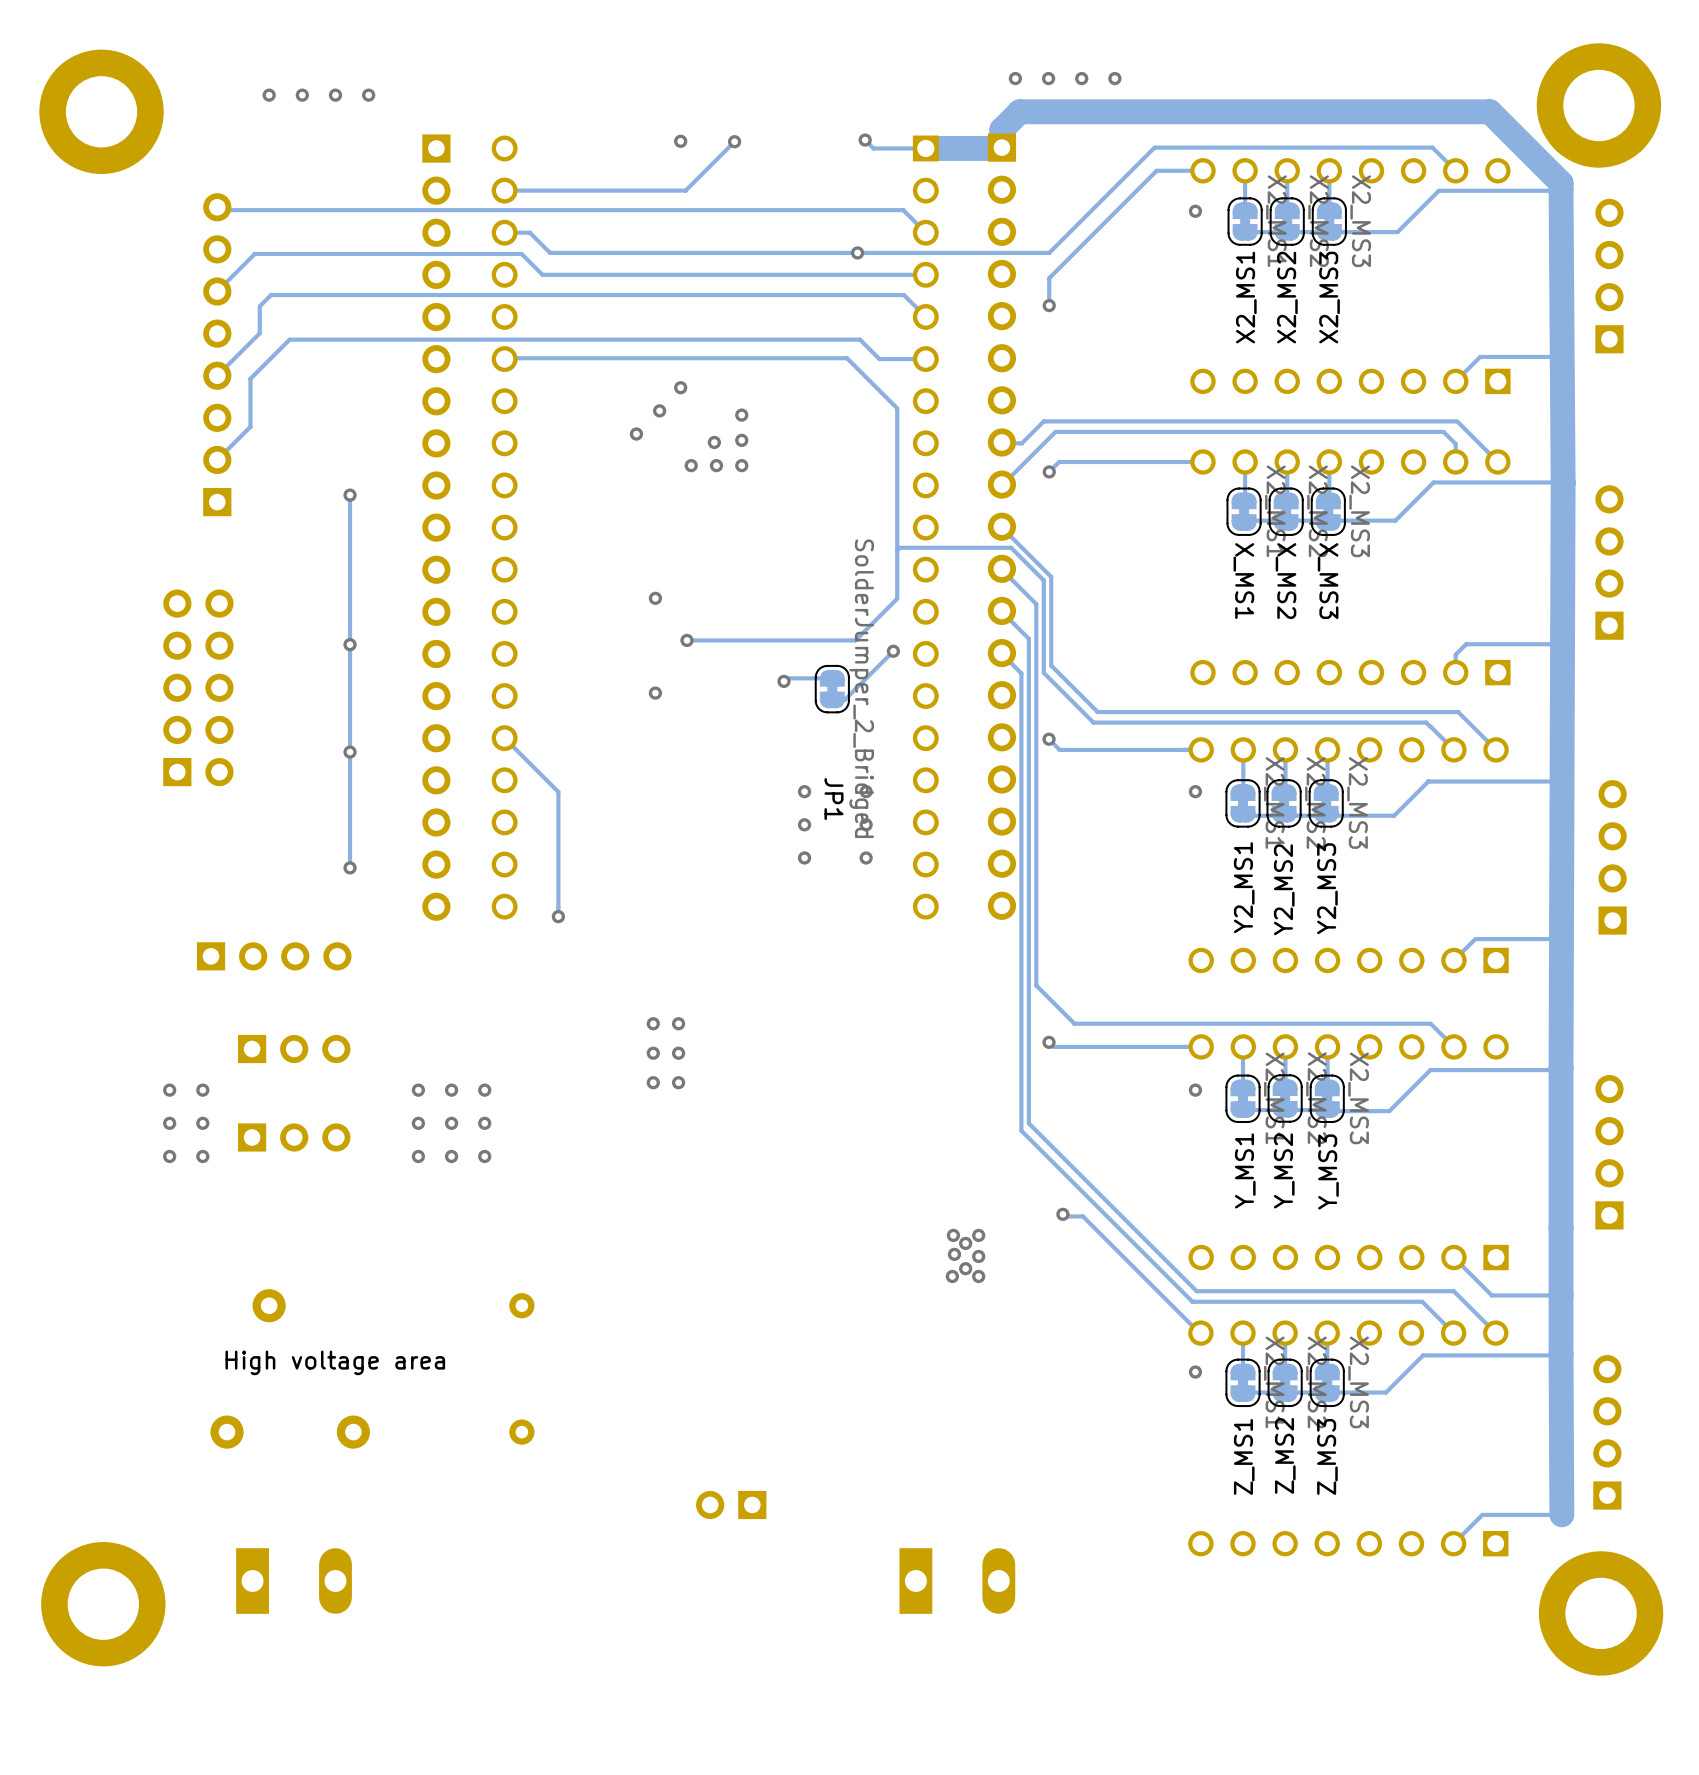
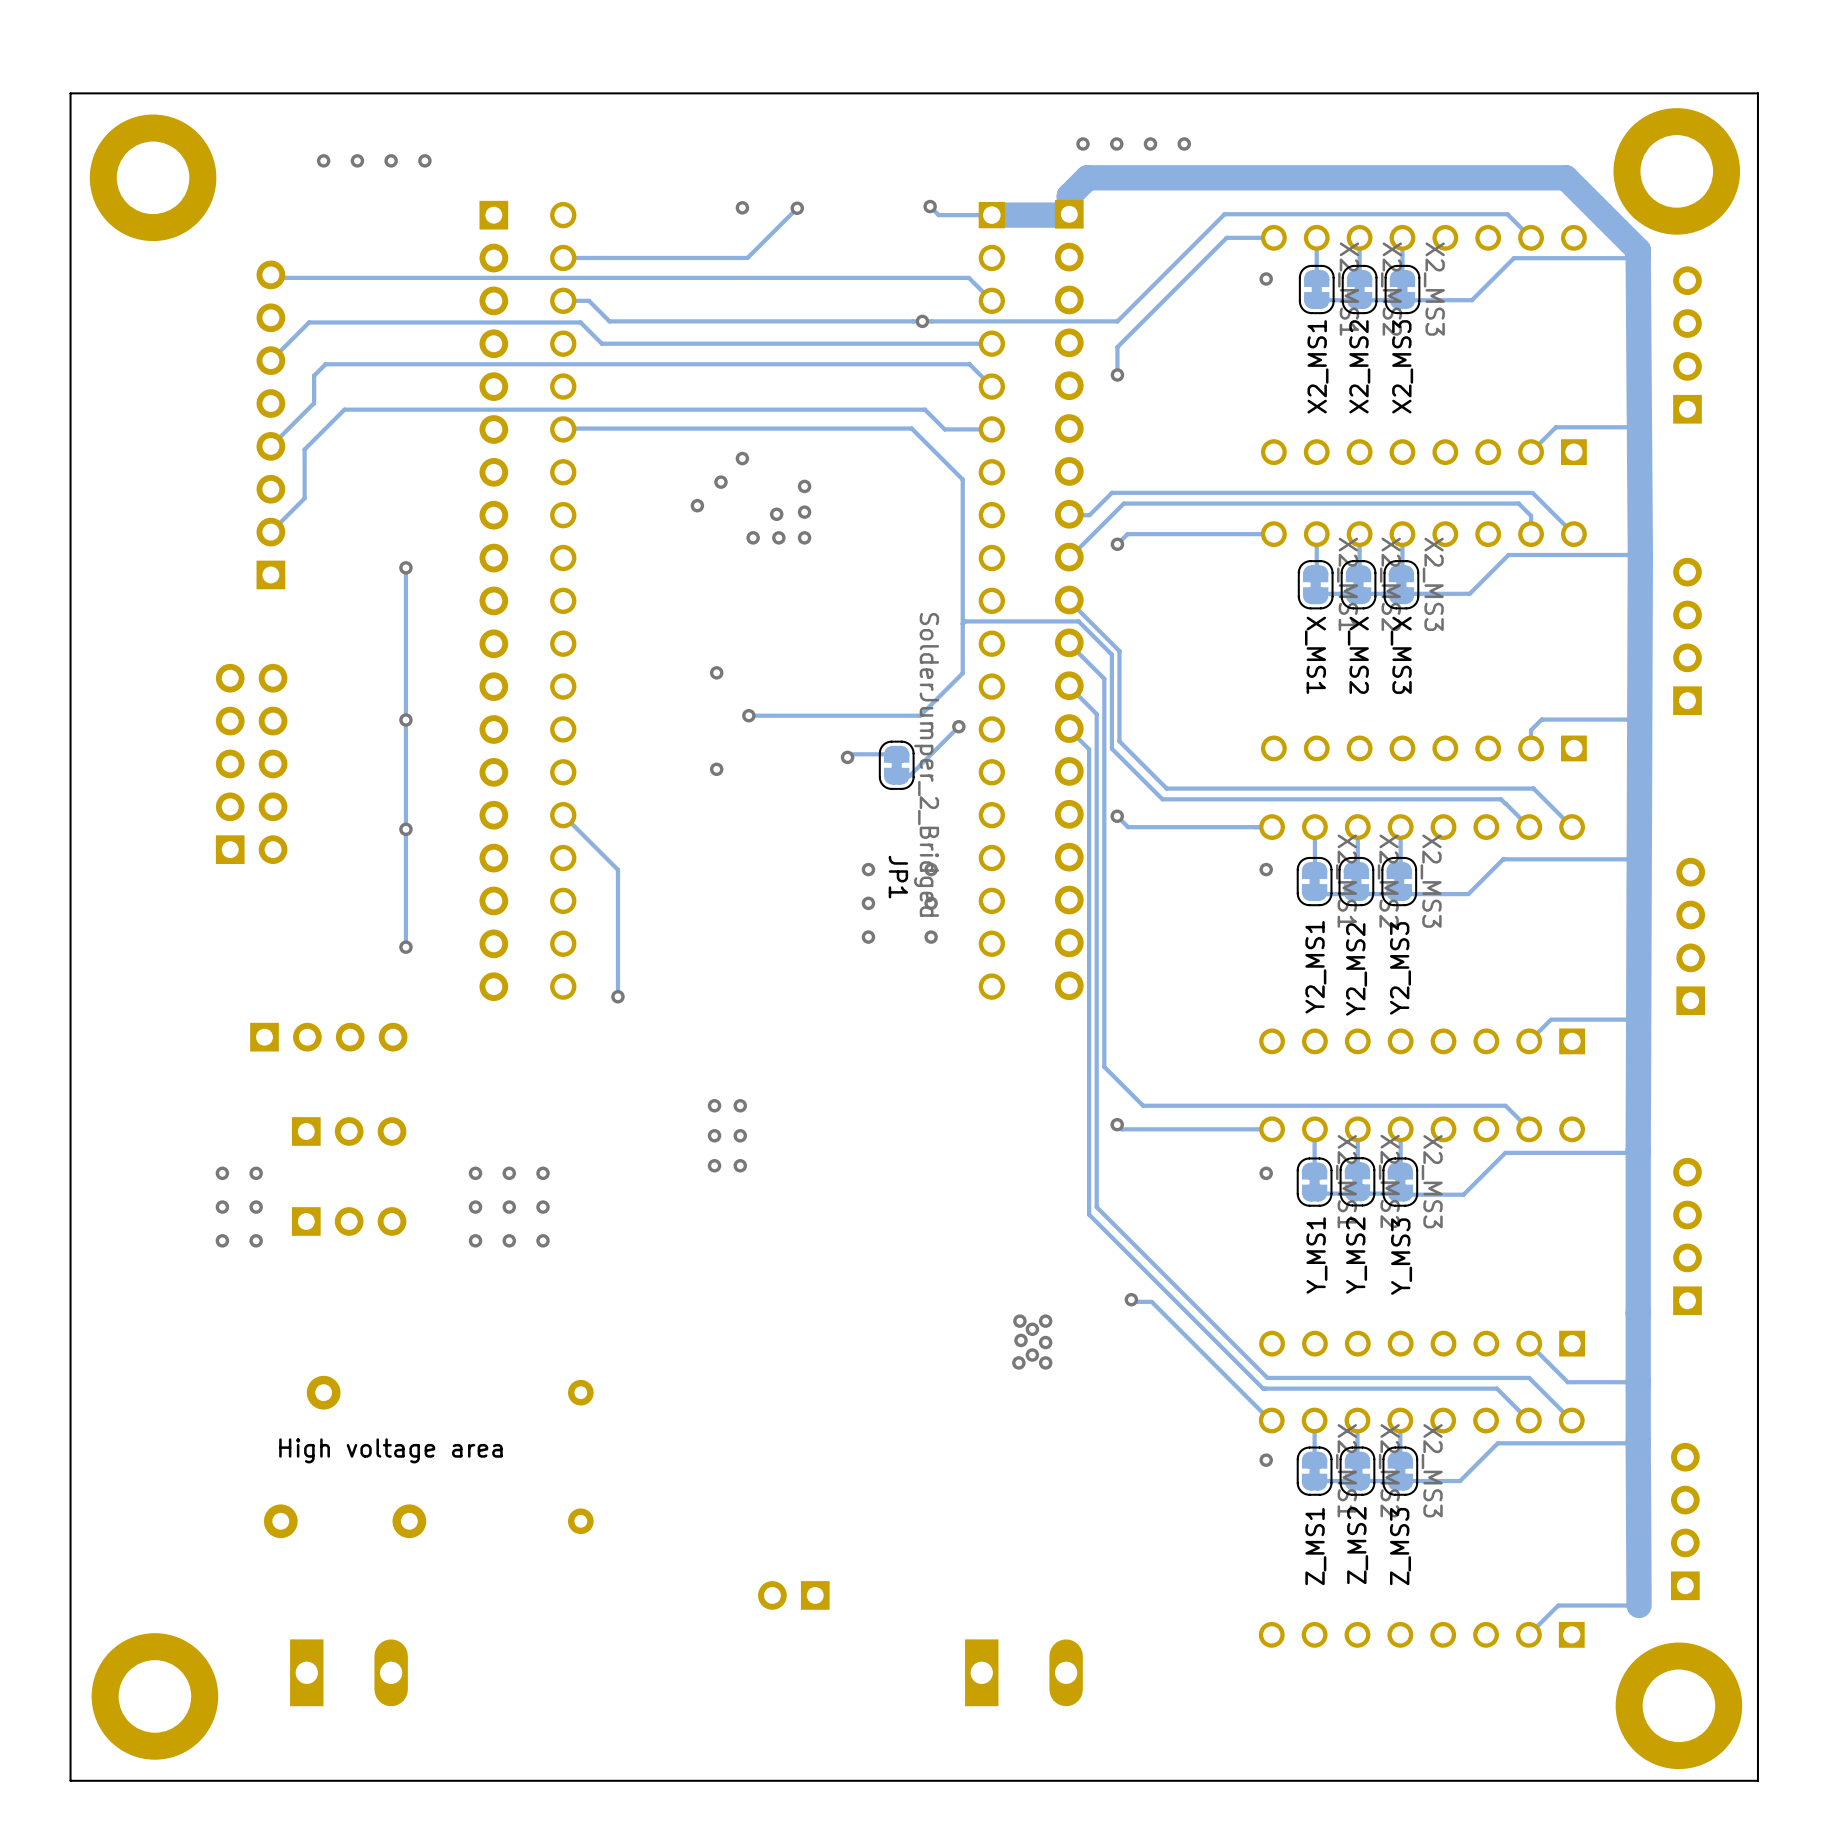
board edge: none -> (1757, 93) (1757, 1780) (70, 1780) (70, 93) (1757, 93)

